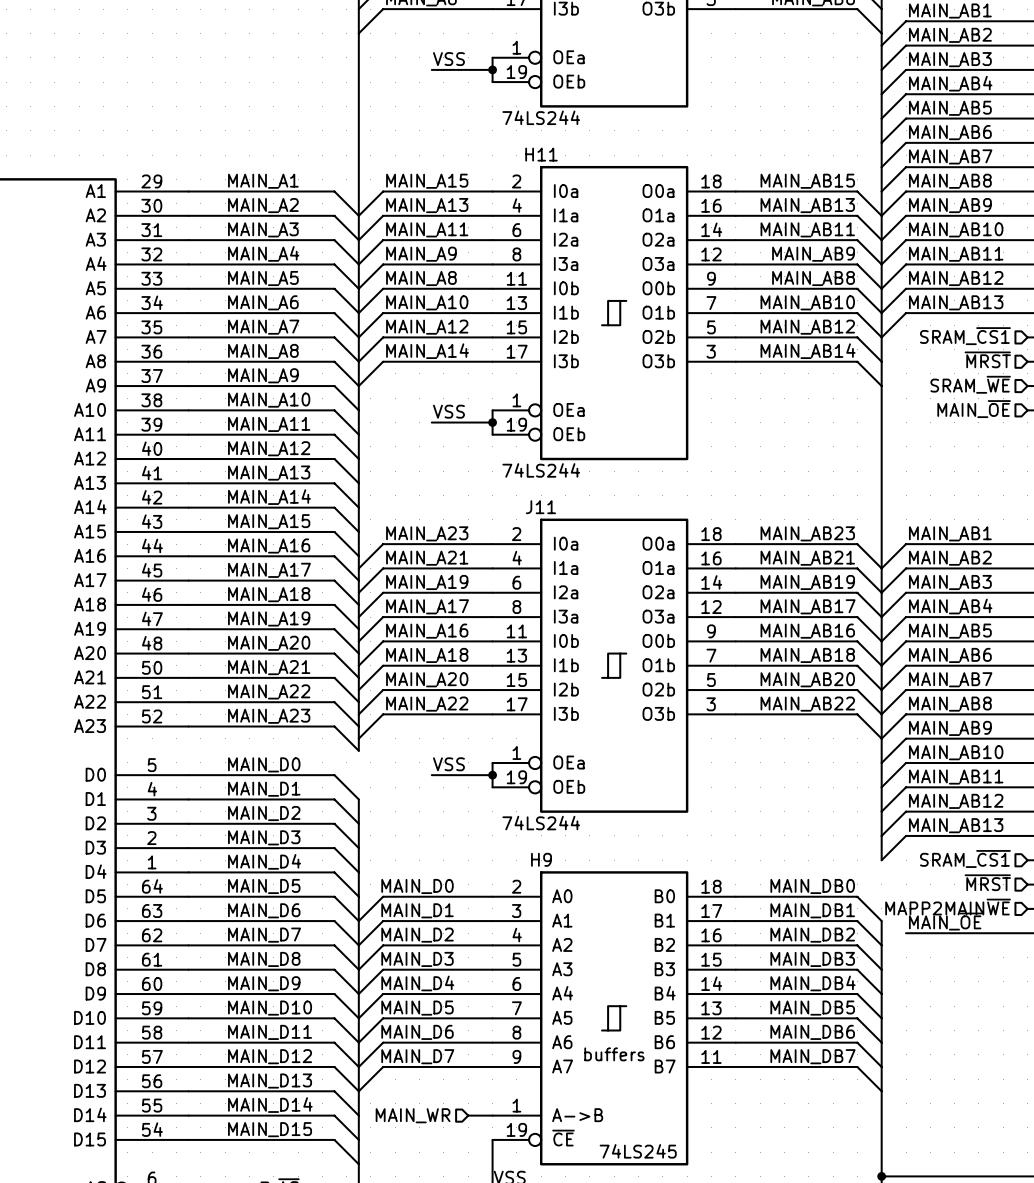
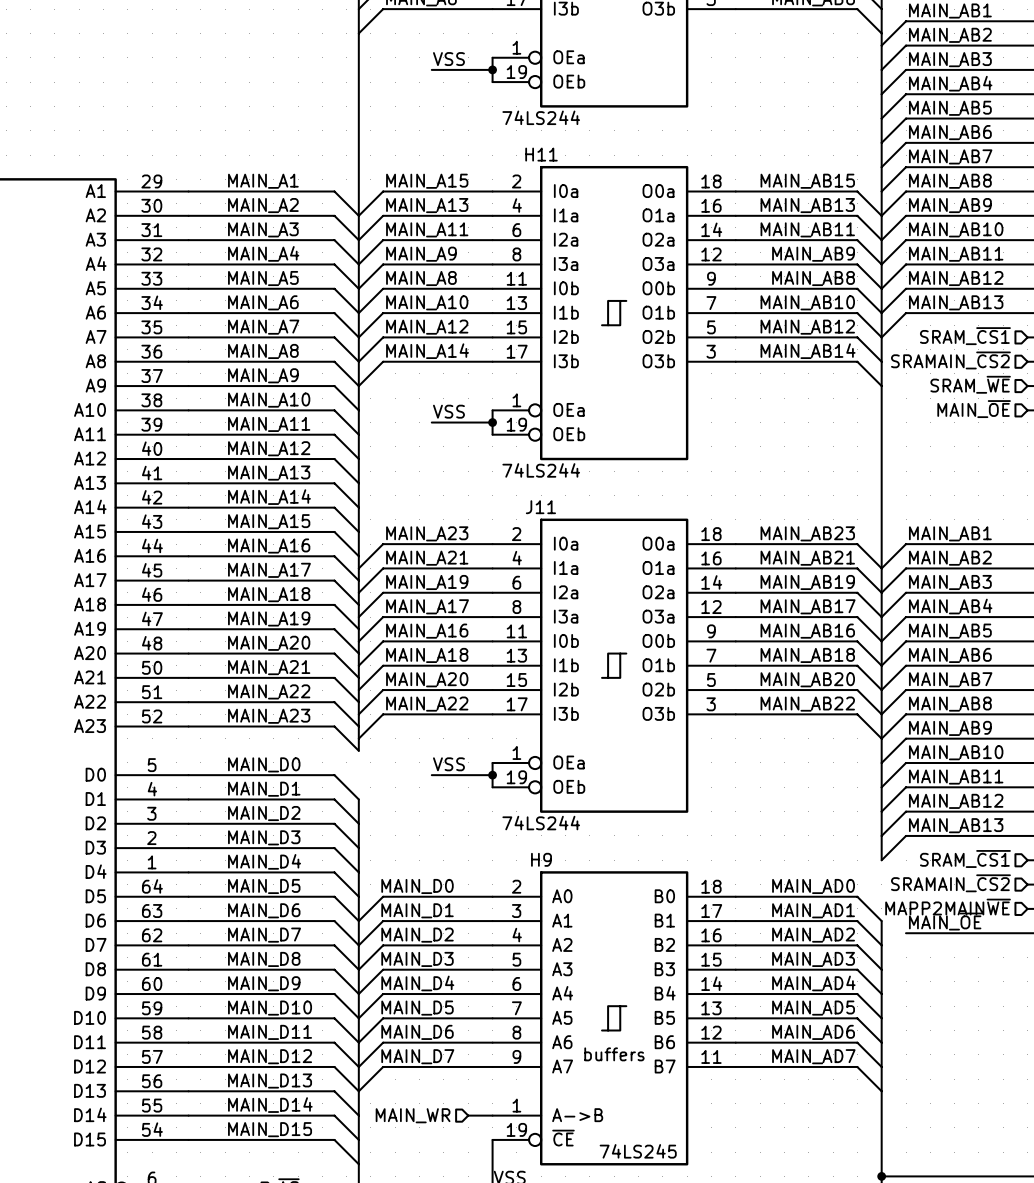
hierarchical label: ~{MRST} (987, 359) -> SRAMAIN_~{CS2} (950, 360)
hierarchical label: ~{MRST} (987, 882) -> SRAMAIN_~{CS2} (950, 883)
label: MAIN_DB0 (812, 886) -> MAIN_AD0 (813, 886)
label: MAIN_DB1 (812, 910) -> MAIN_AD1 (813, 910)
label: MAIN_DB2 (812, 935) -> MAIN_AD2 (813, 935)
label: MAIN_DB3 (812, 959) -> MAIN_AD3 (813, 959)
label: MAIN_DB4 (812, 983) -> MAIN_AD4 (813, 983)
label: MAIN_DB5 (812, 1008) -> MAIN_AD5 (813, 1008)
label: MAIN_DB6 (812, 1032) -> MAIN_AD6 (813, 1032)
label: MAIN_DB7 (812, 1056) -> MAIN_AD7 (813, 1056)

